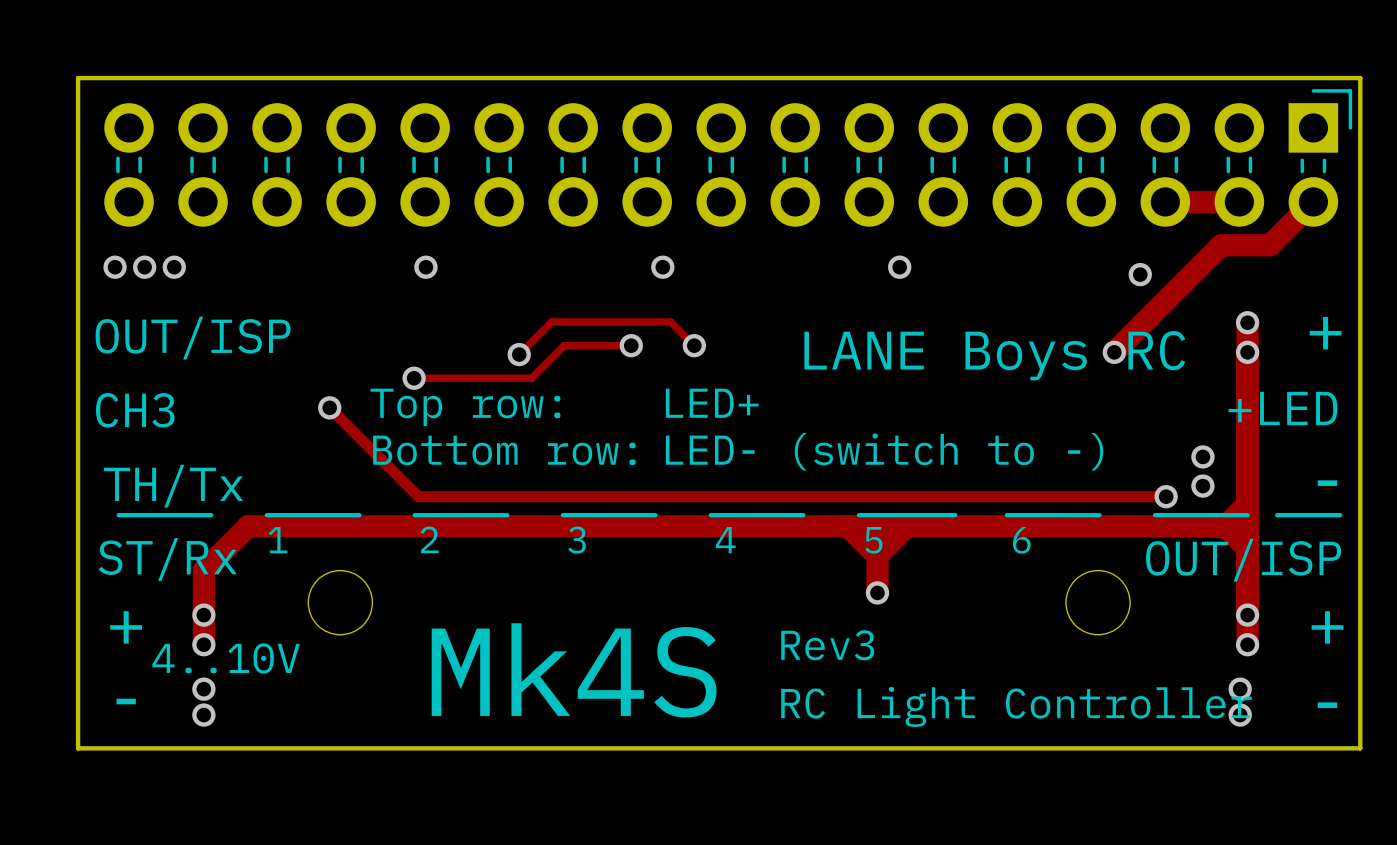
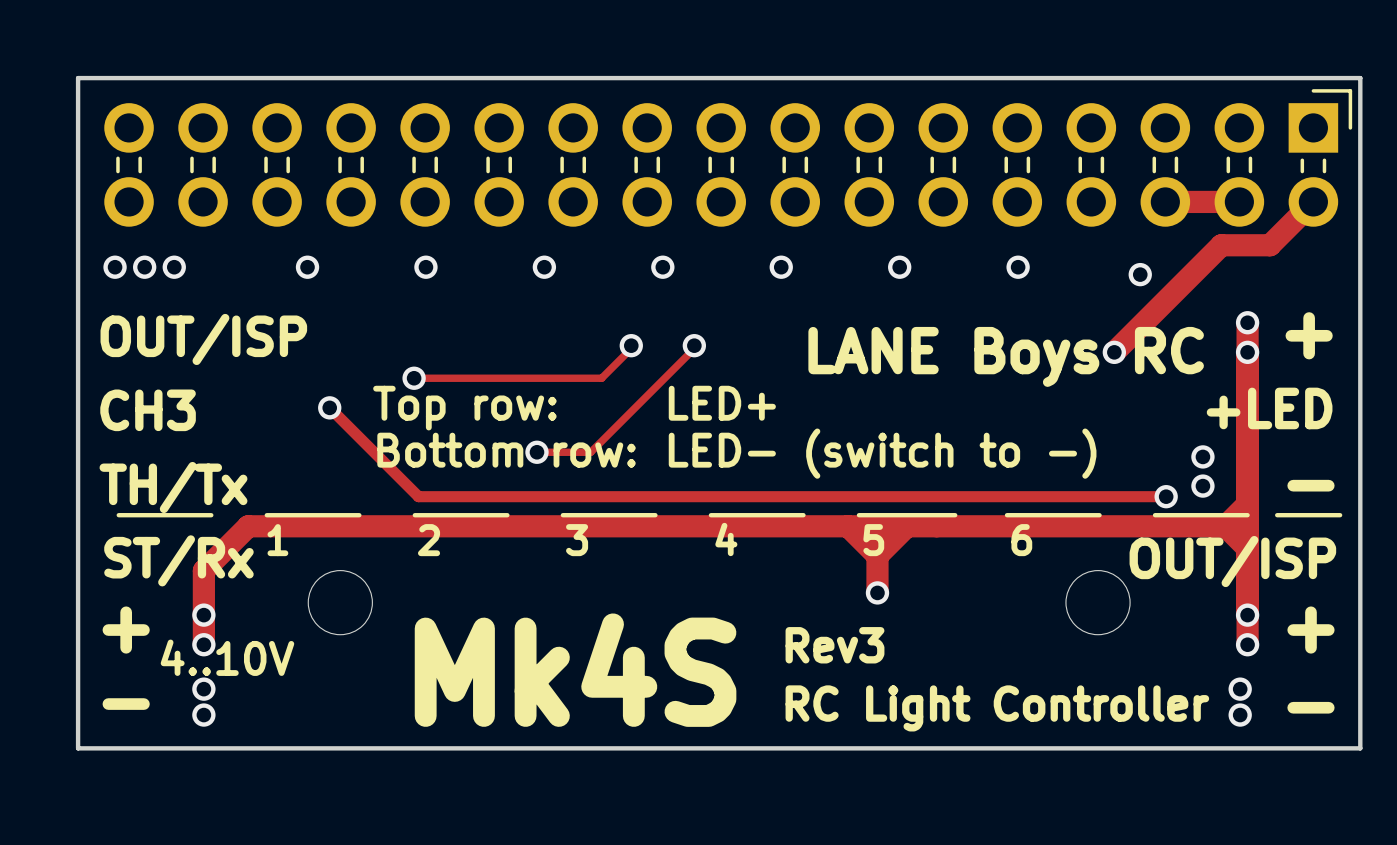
via: none -> (307, 267)
via: none -> (544, 267)
via: none -> (781, 267)
via: none -> (1018, 267)
track: (631, 345) (564, 345) (531, 378) -> (631, 348) (601, 378) (531, 378)
track: (694, 345) (670, 321) (551, 321) (519, 354) -> none
track: none -> (694, 348) (590, 452) (536, 452)
via: (519, 354) -> none
via: none -> (536, 452)

